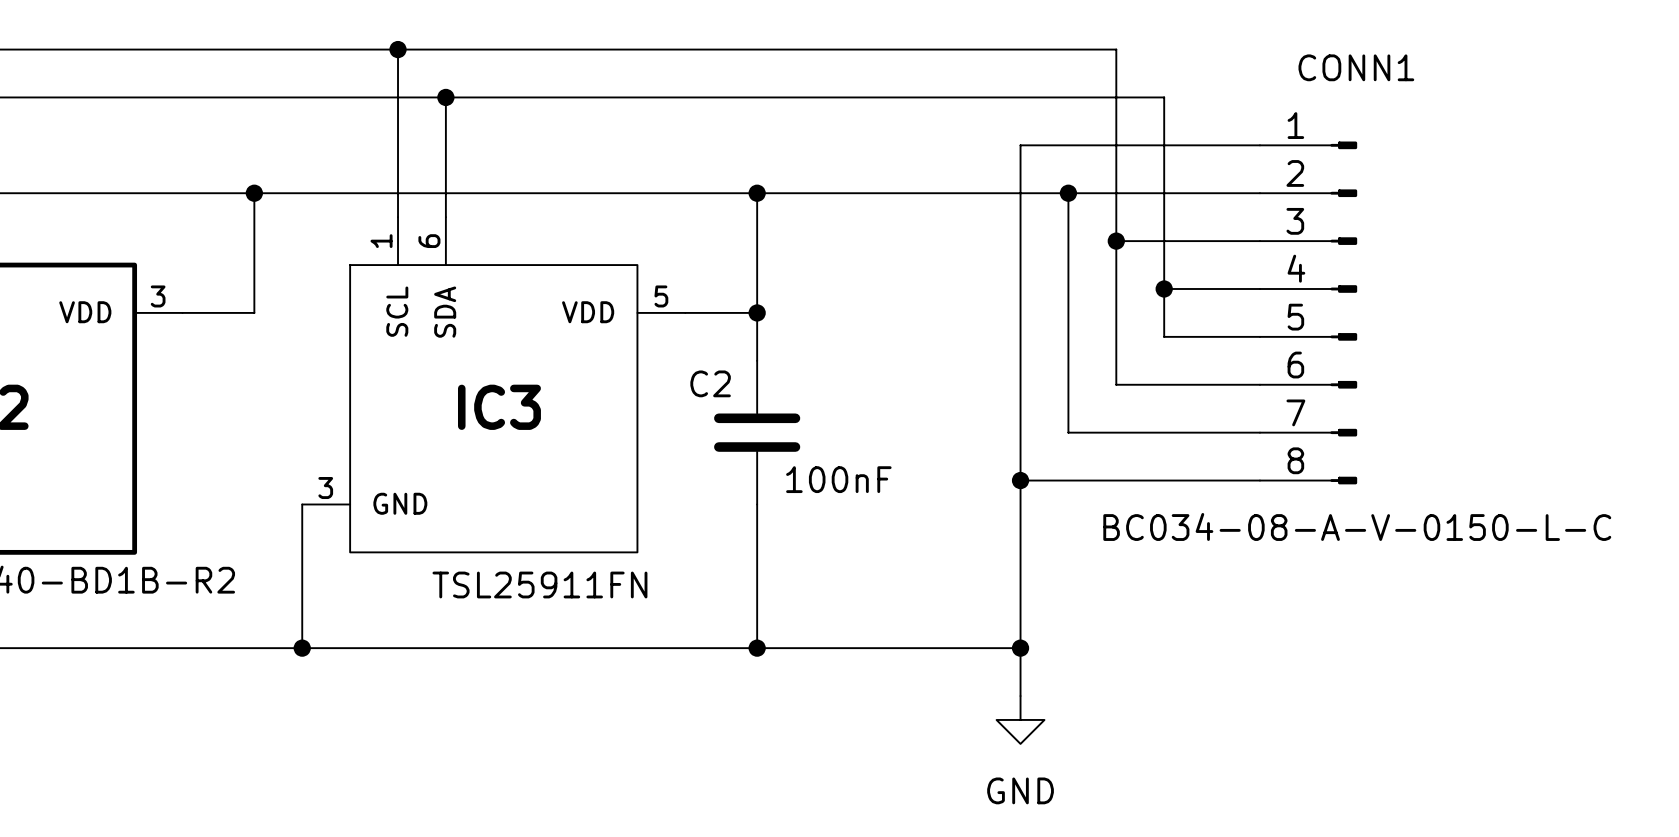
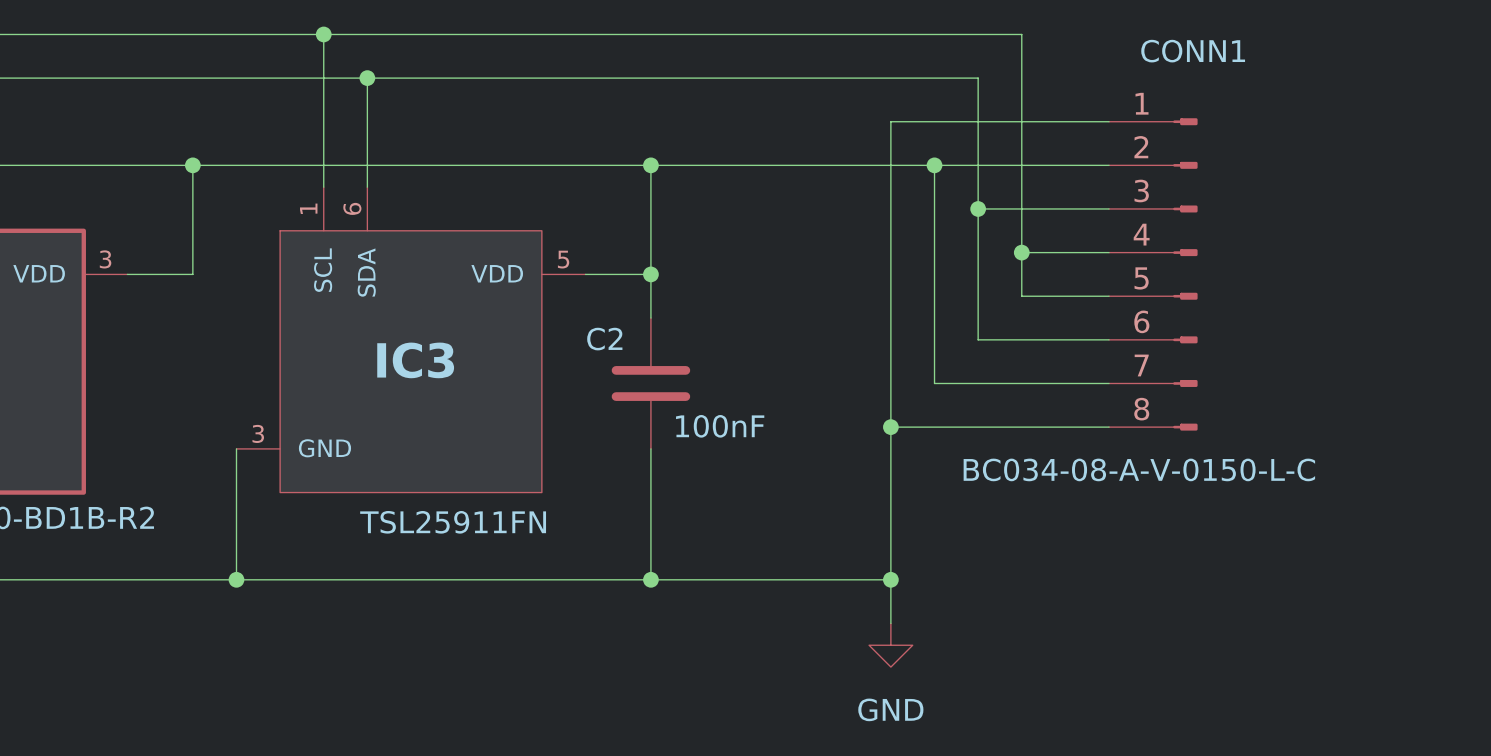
wire: (1116, 49) (1116, 97) (1164, 97) -> (978, 34) (1021, 34) (1021, 78)

